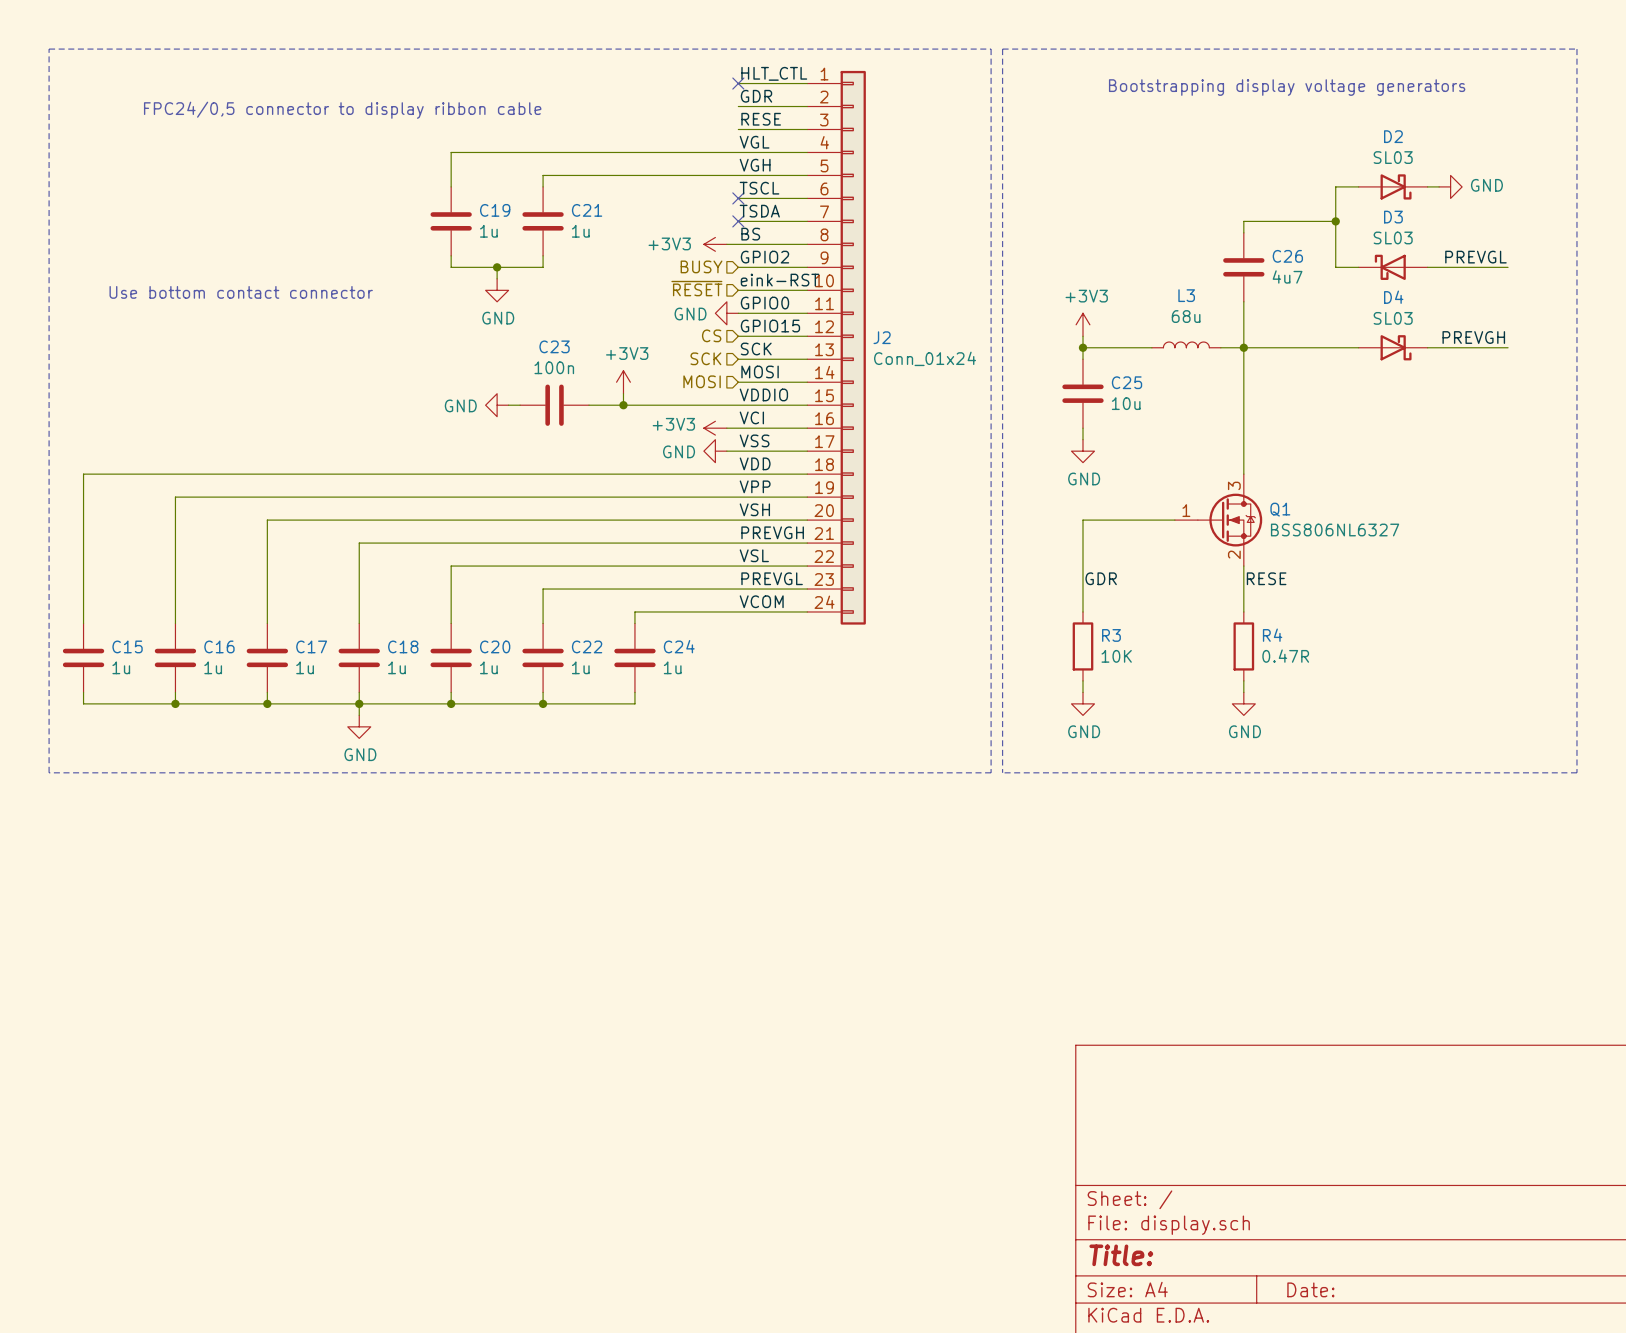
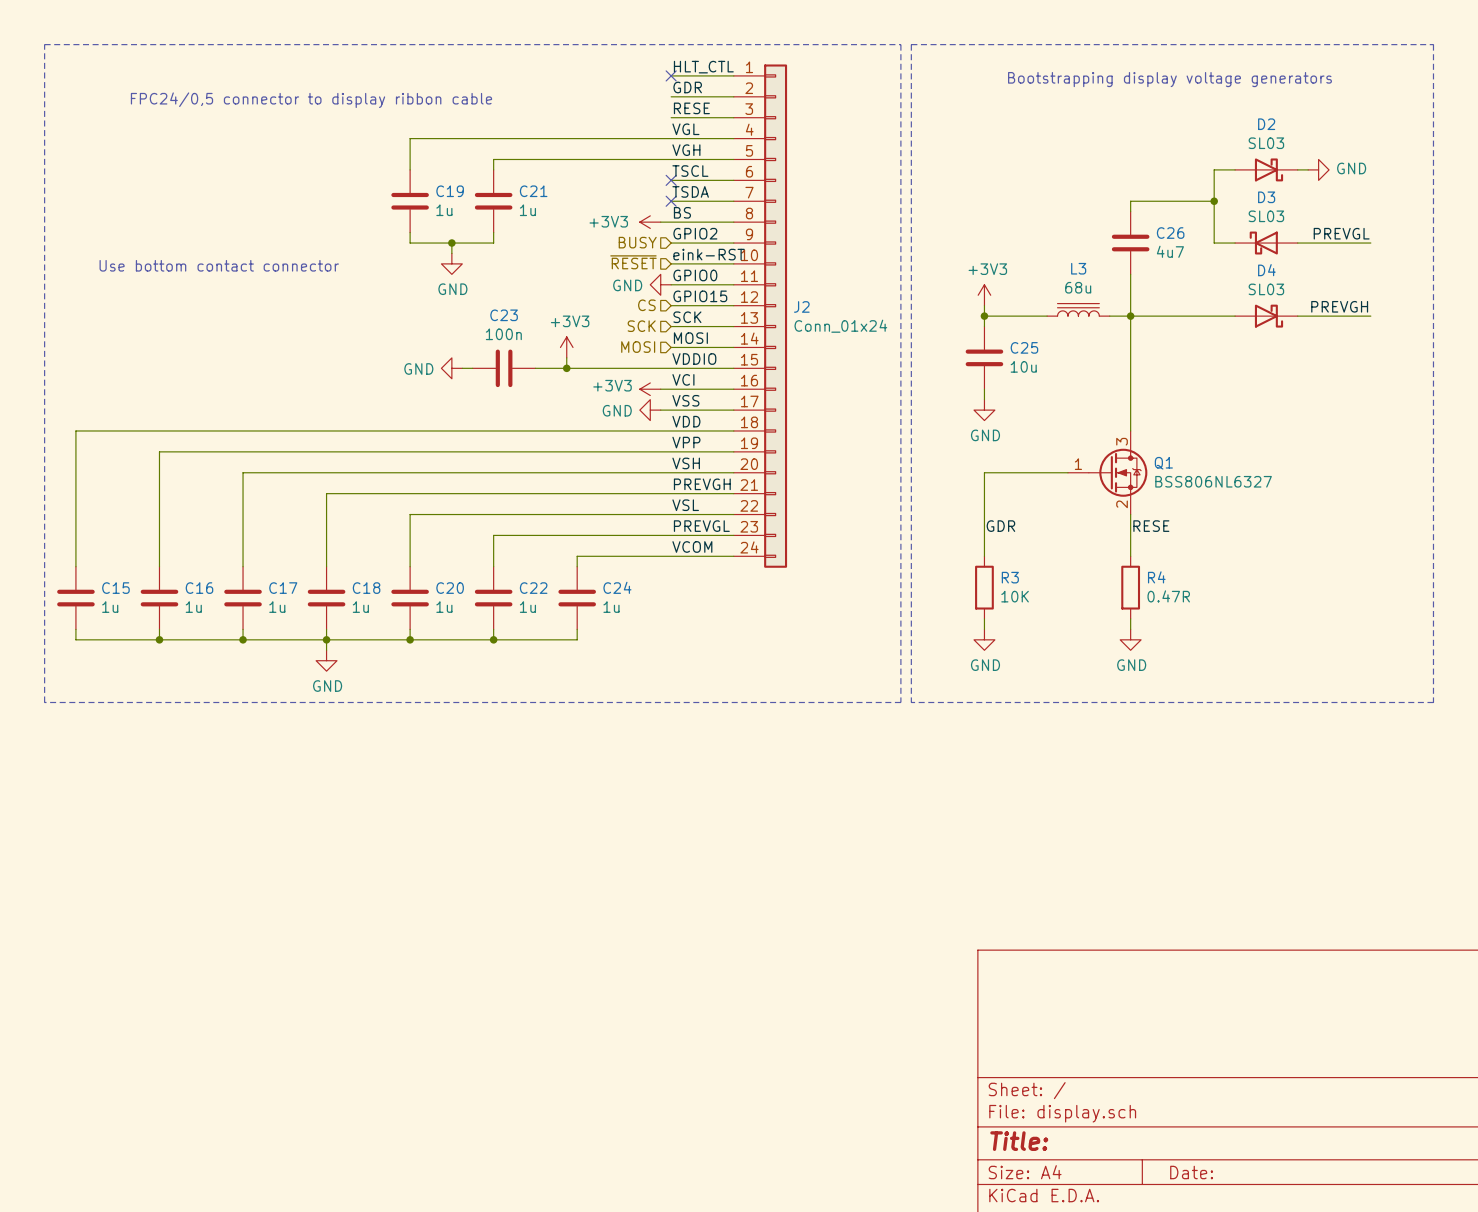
L3 symbol: [1151, 342, 1221, 348] -> [1047, 303, 1110, 317]

